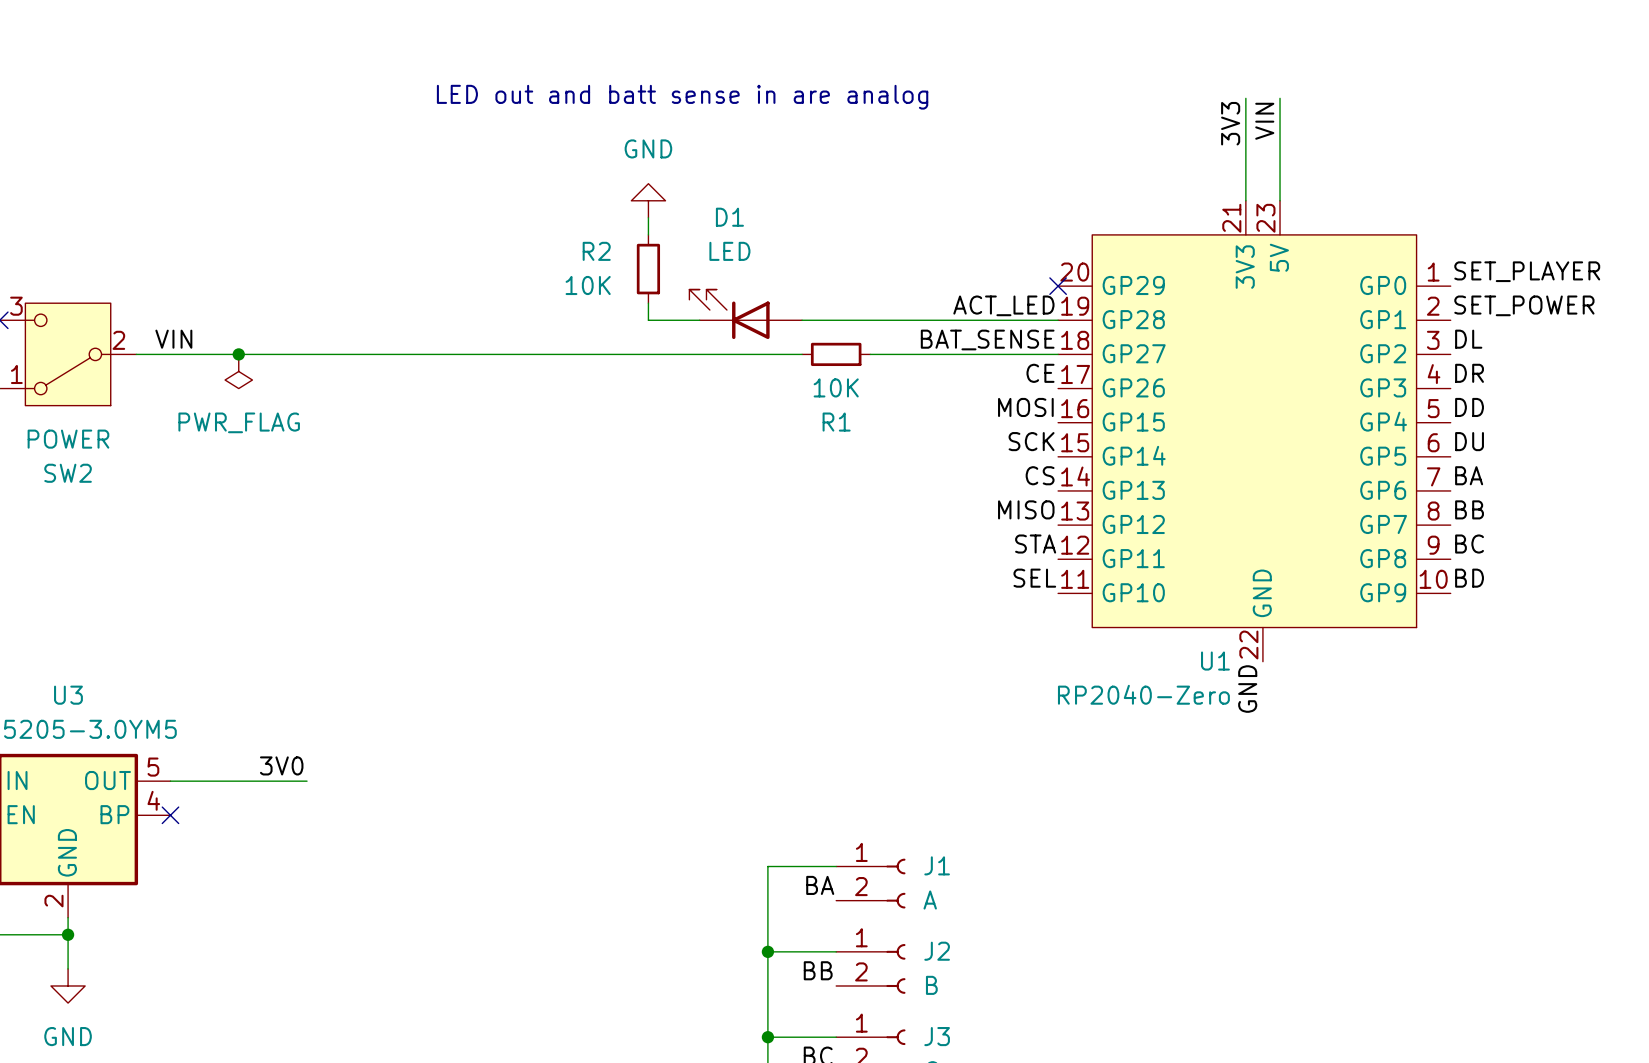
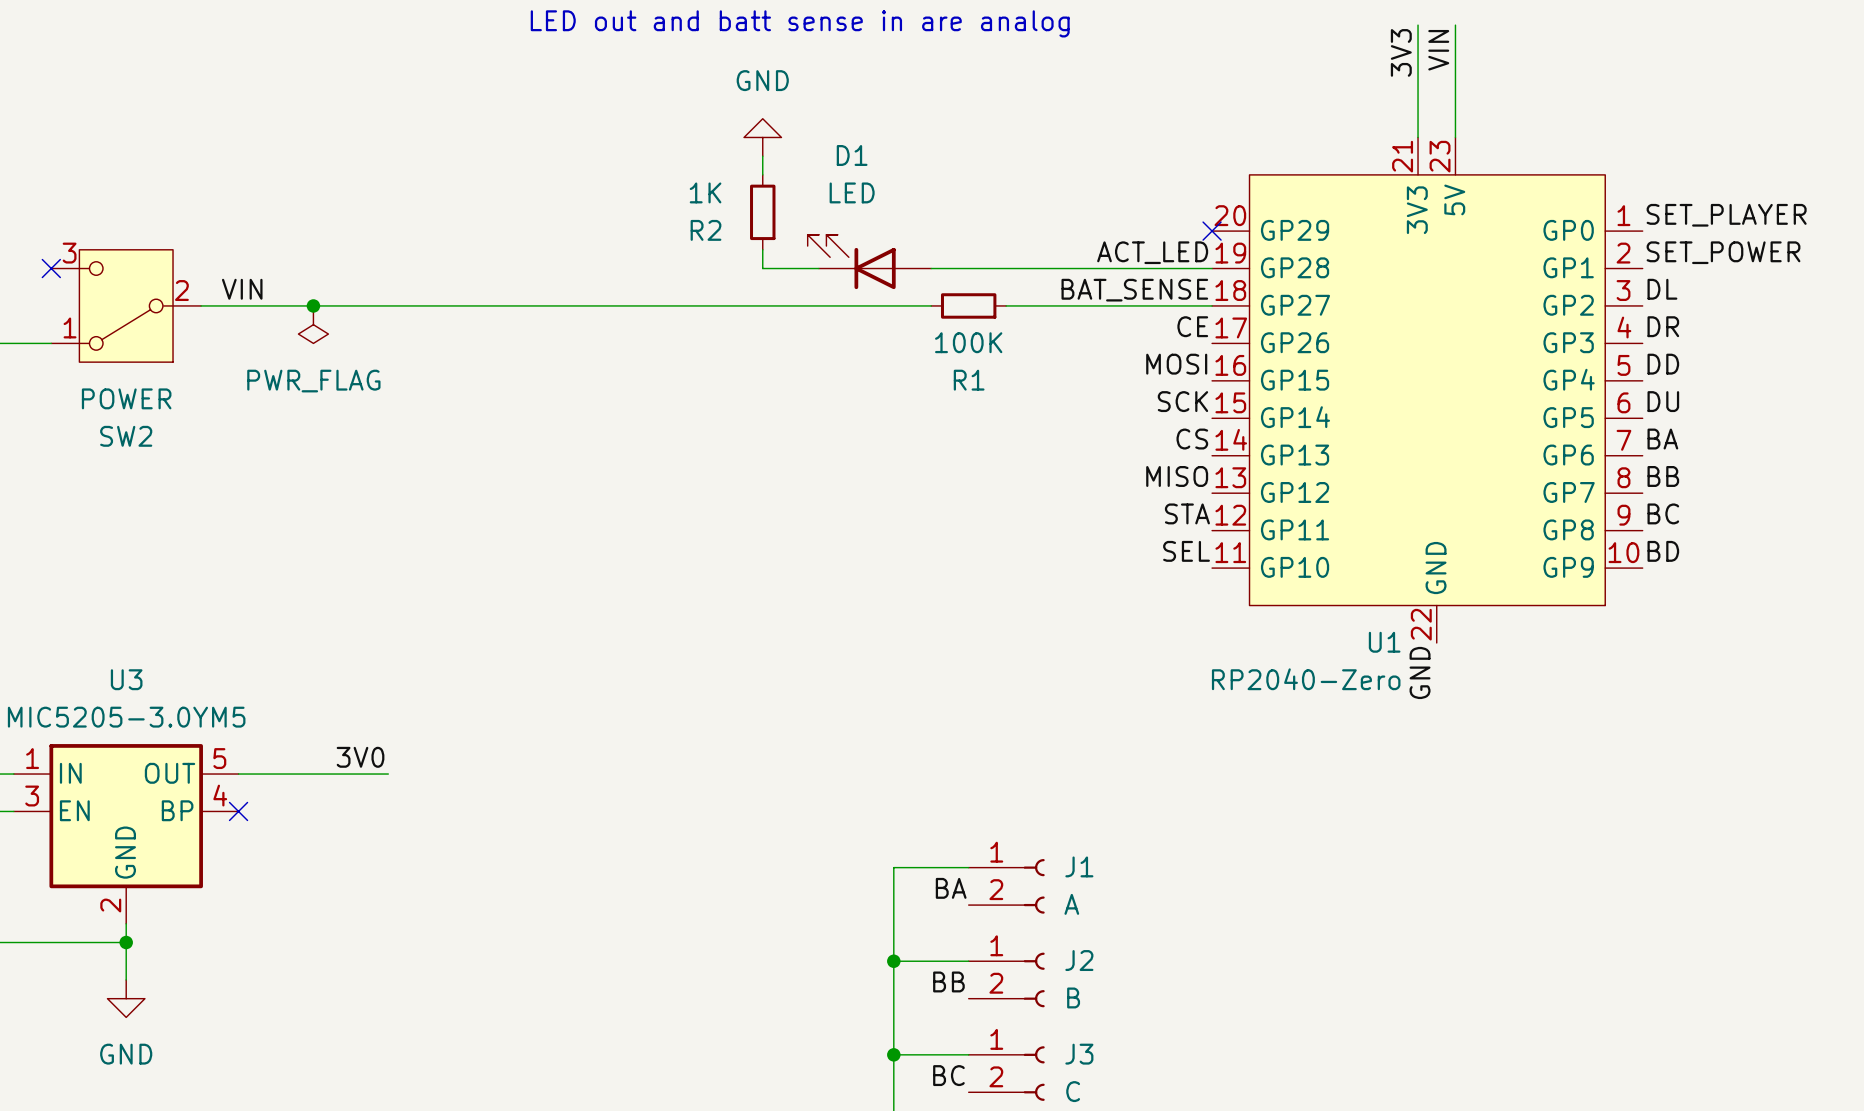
R2 name position: R2 (596, 251) -> R2 (706, 230)
R2 value: 10K (588, 285) -> 1K (705, 192)
R1 value: 10K (836, 387) -> 100K (968, 342)

